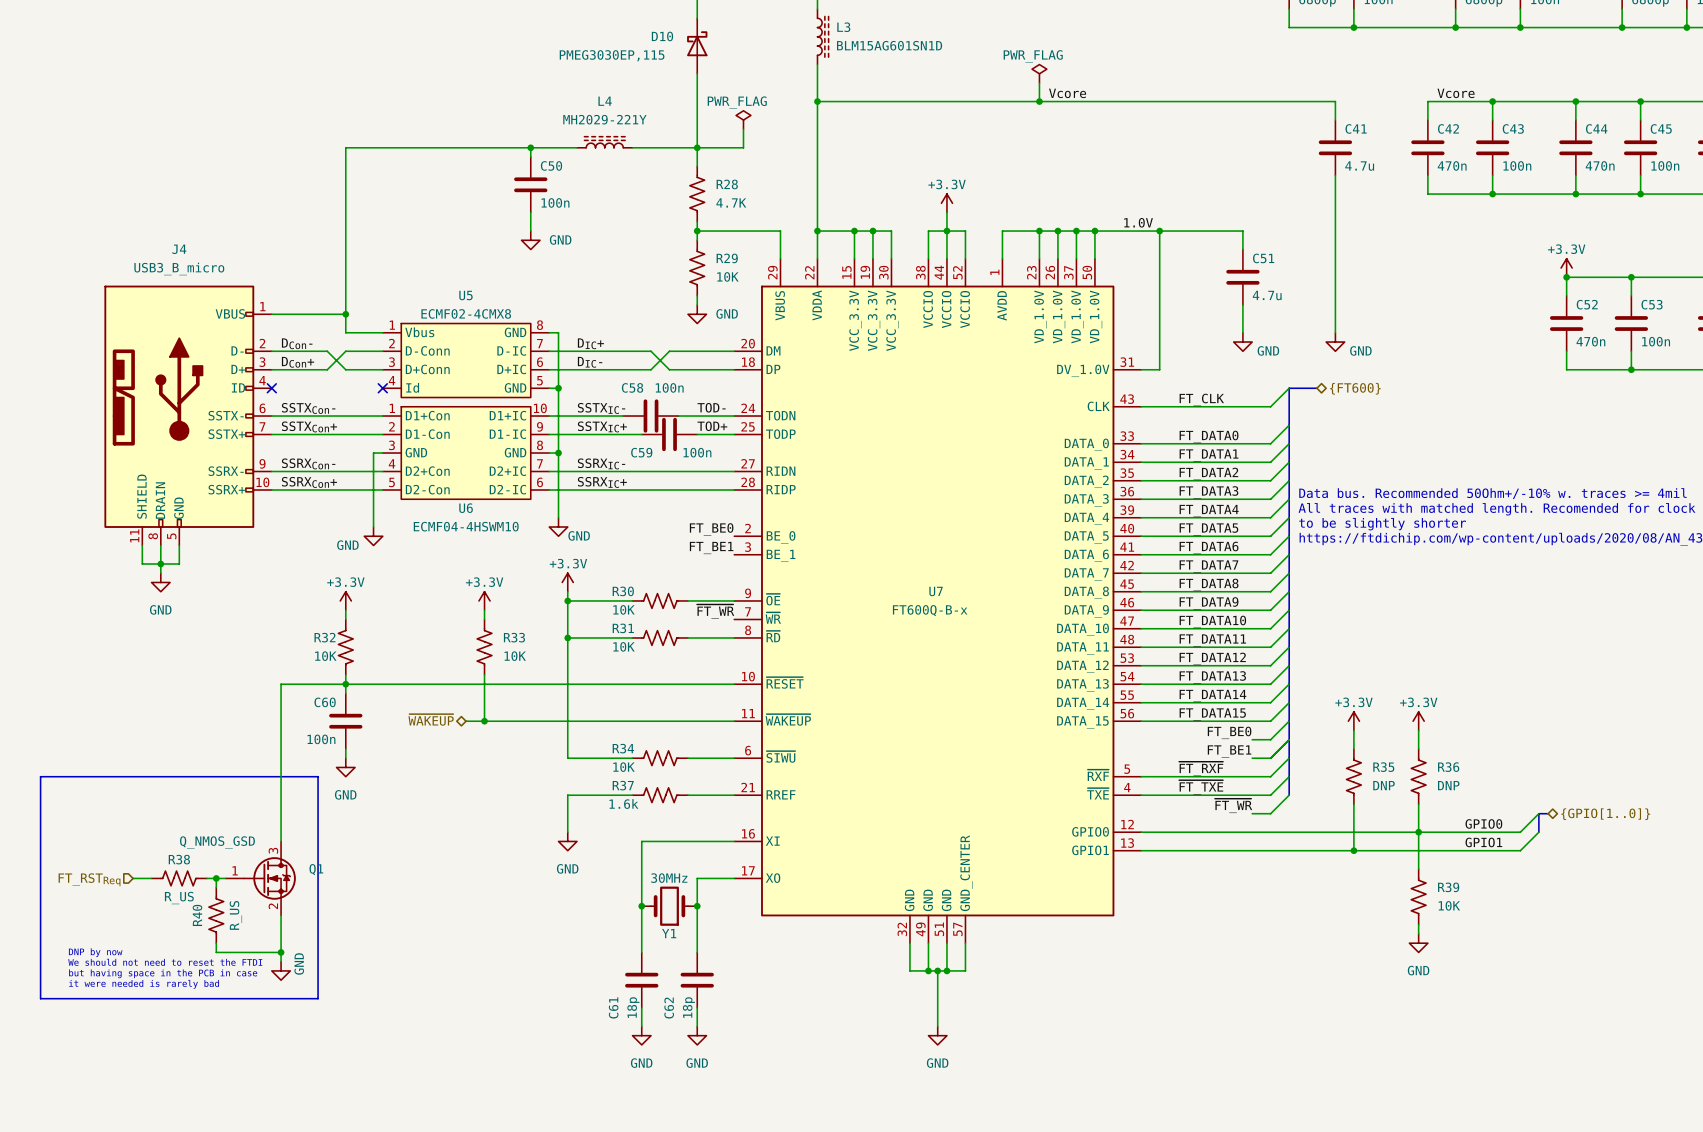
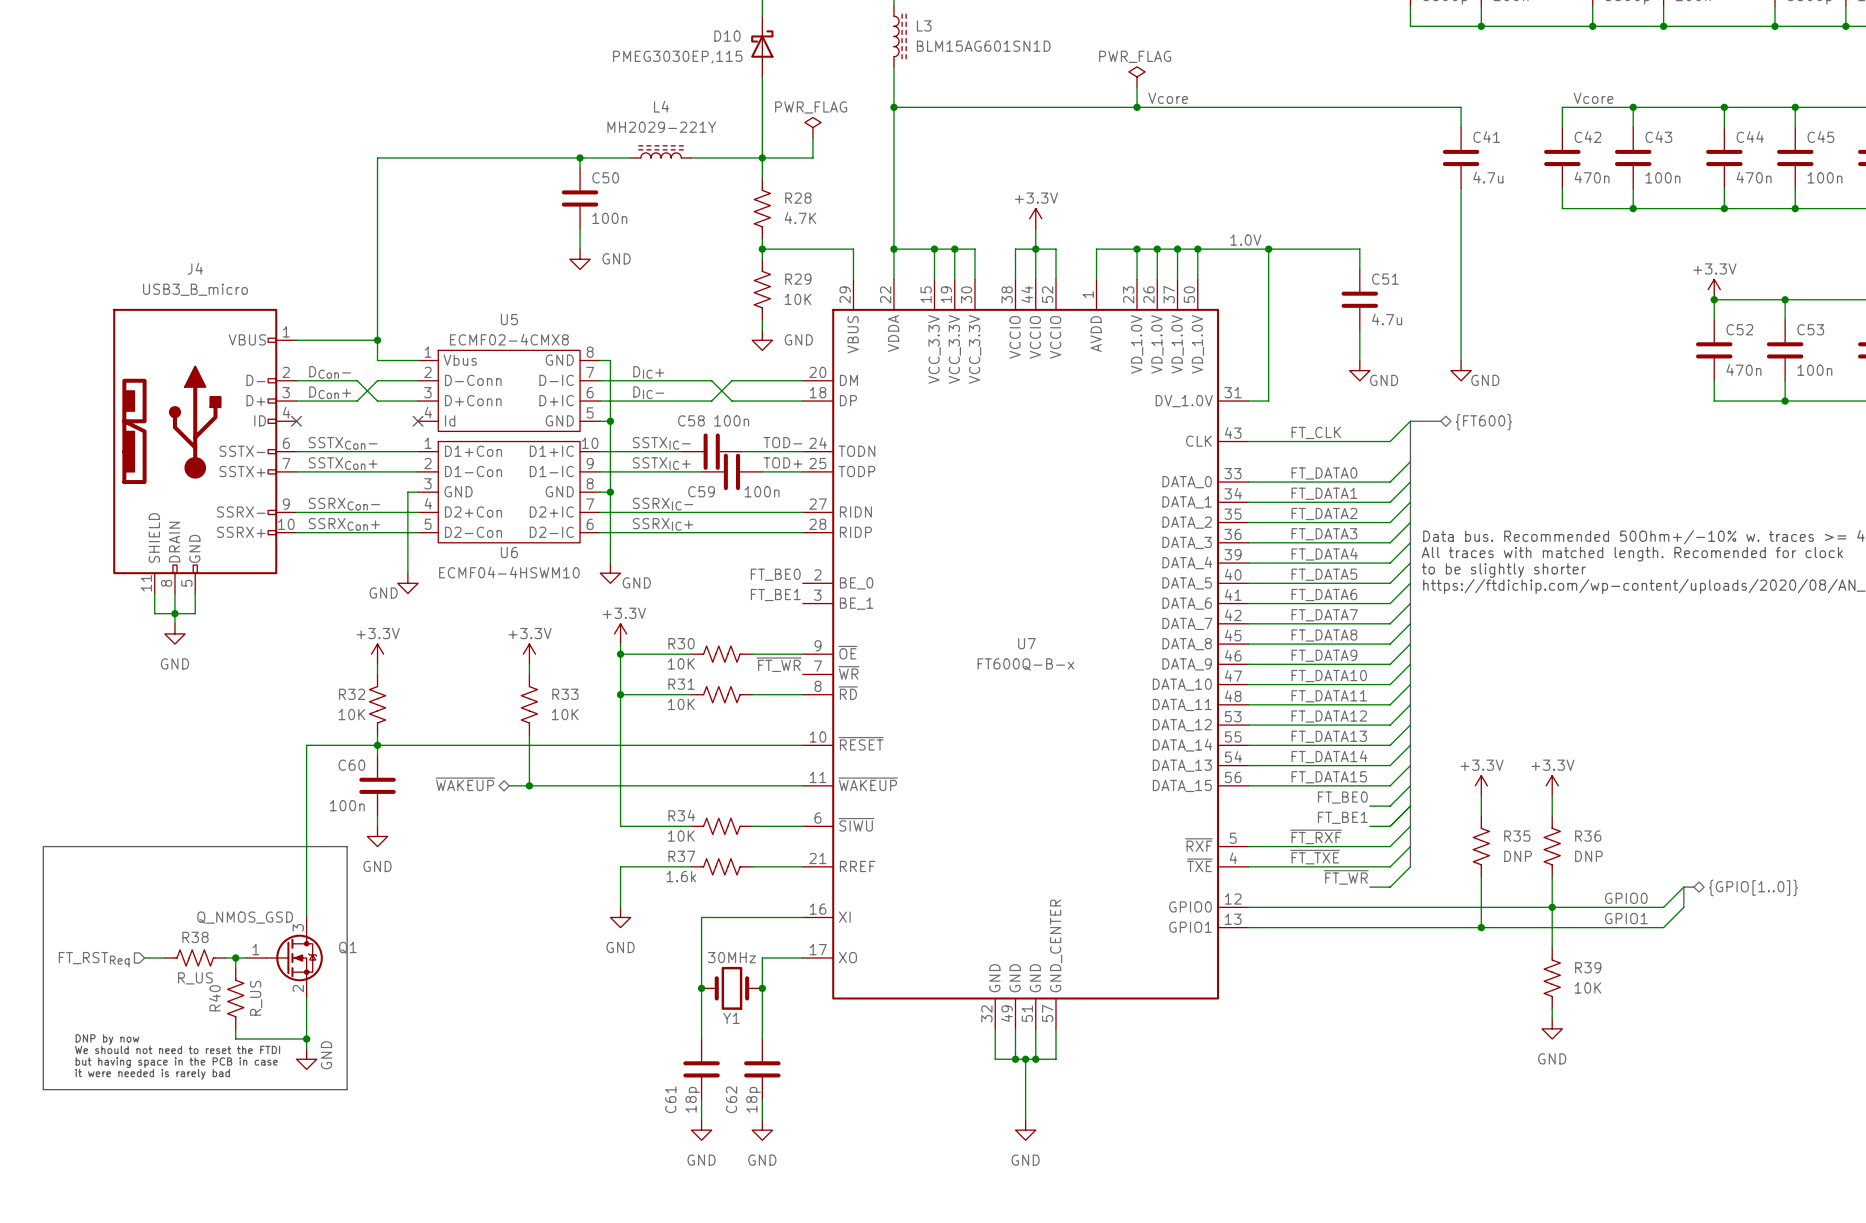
U7 pin number: 54 (1127, 676) -> 55 (1233, 736)
U7 pin name: DATA_13 (1082, 685) -> DATA_14 (1182, 745)
U7 pin number: 55 (1127, 695) -> 54 (1233, 756)
U7 pin name: DATA_14 (1083, 703) -> DATA_13 (1182, 765)

